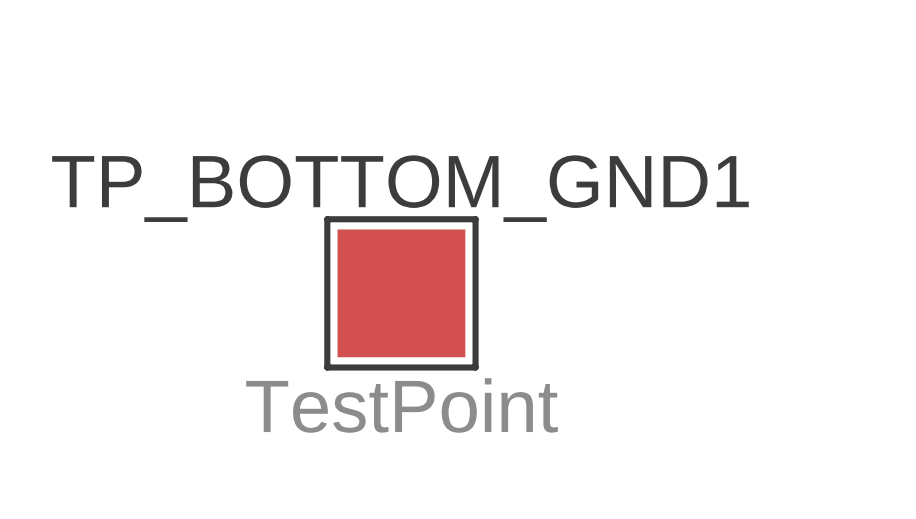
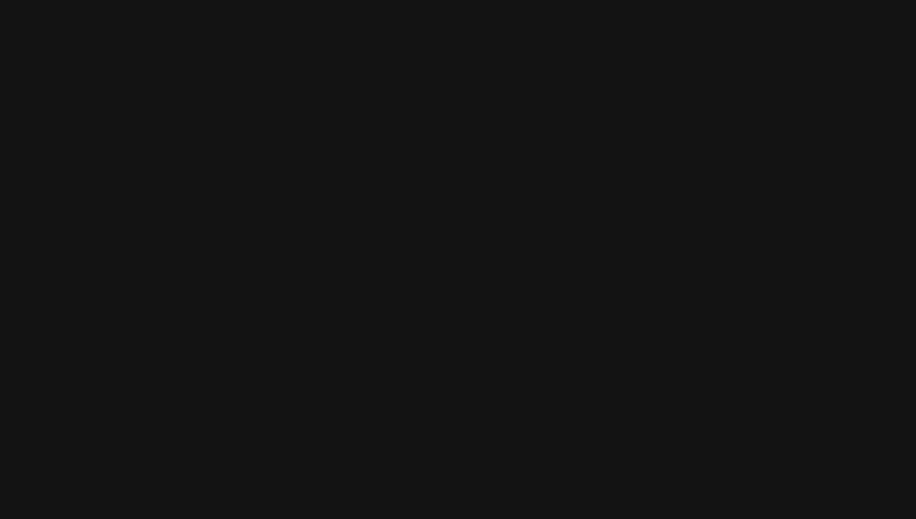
TP_BOTTOM_GND1: TestPoint (401, 293) -> none

